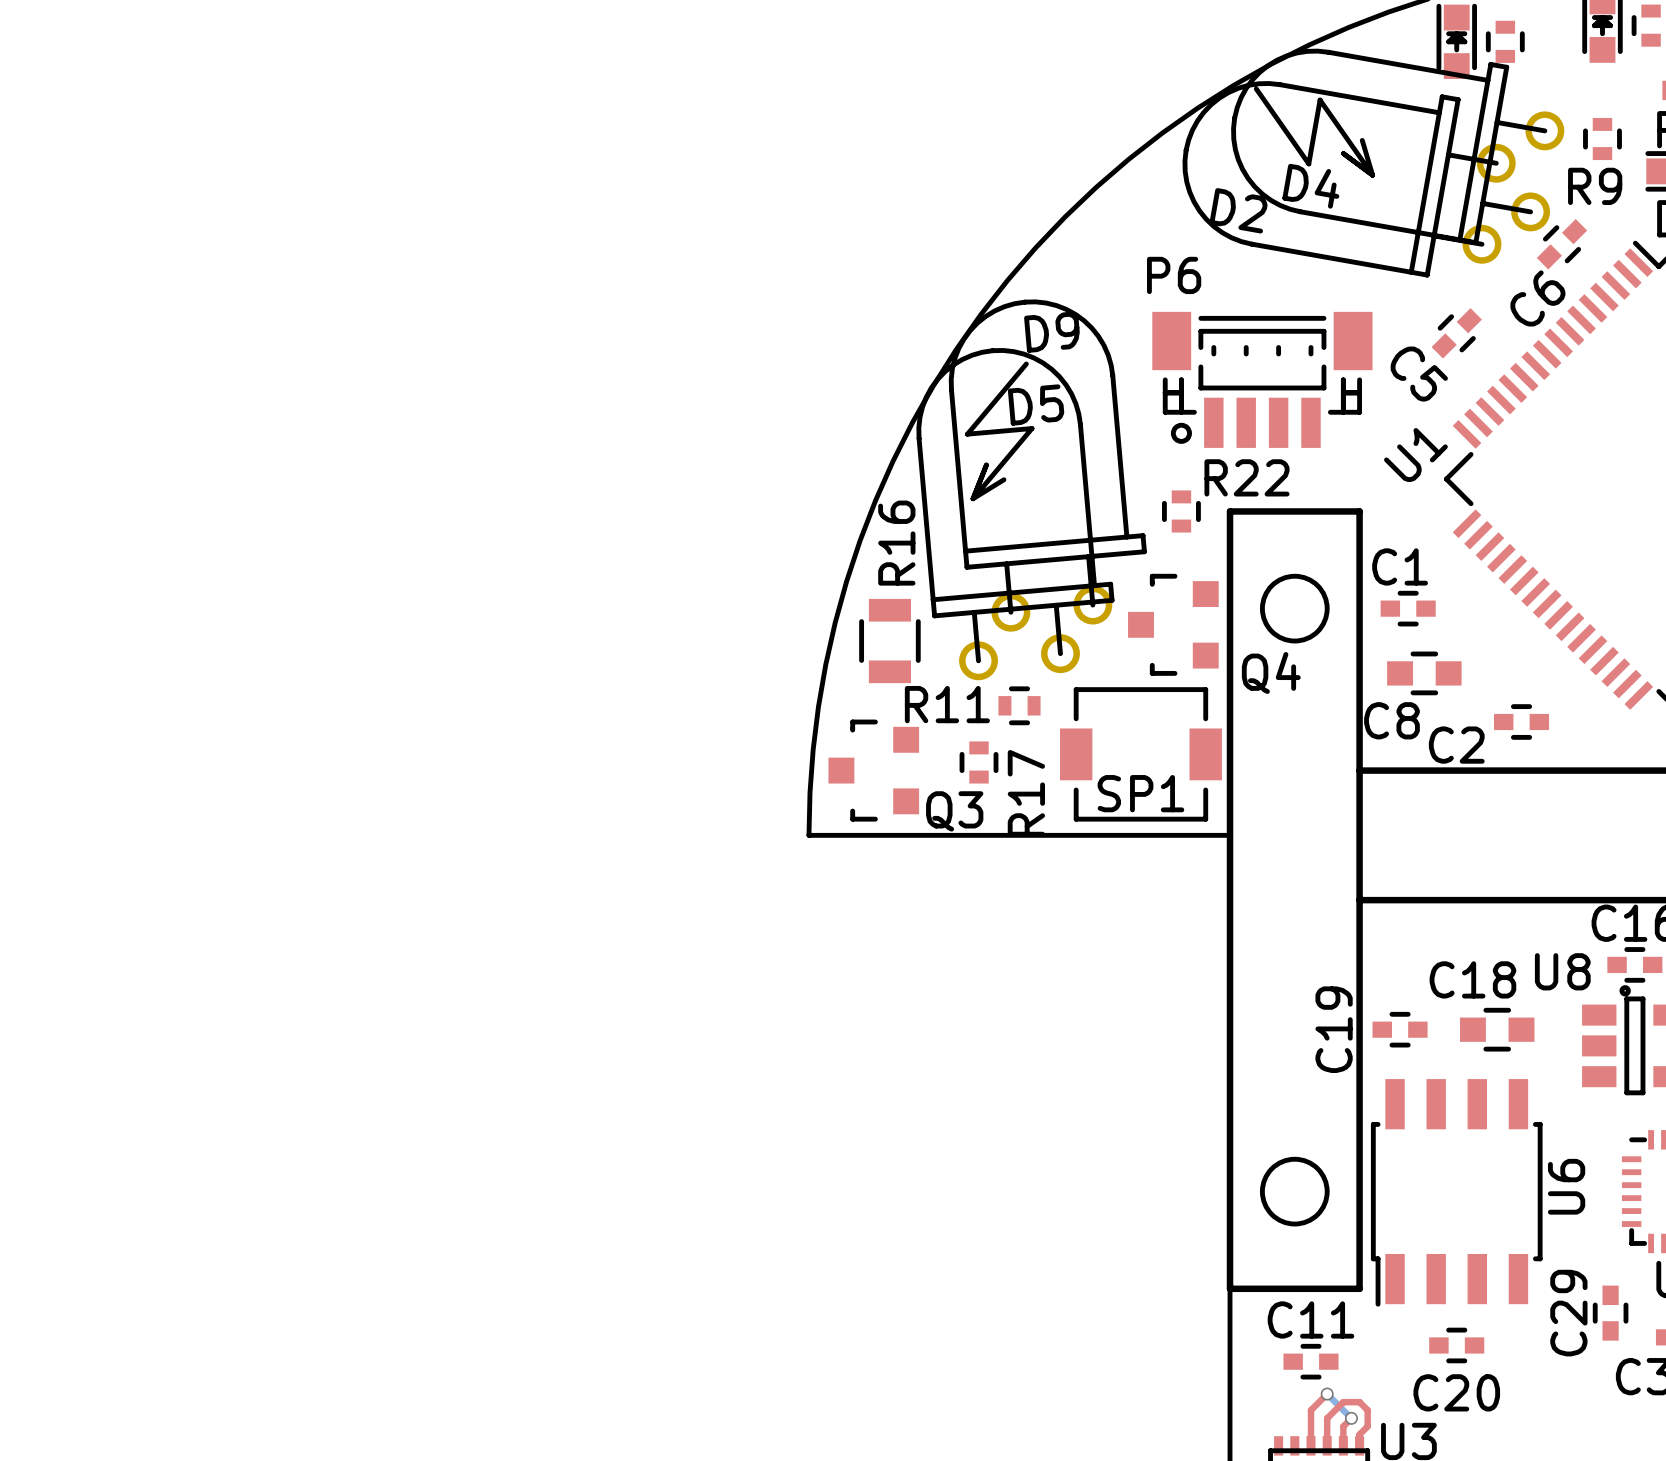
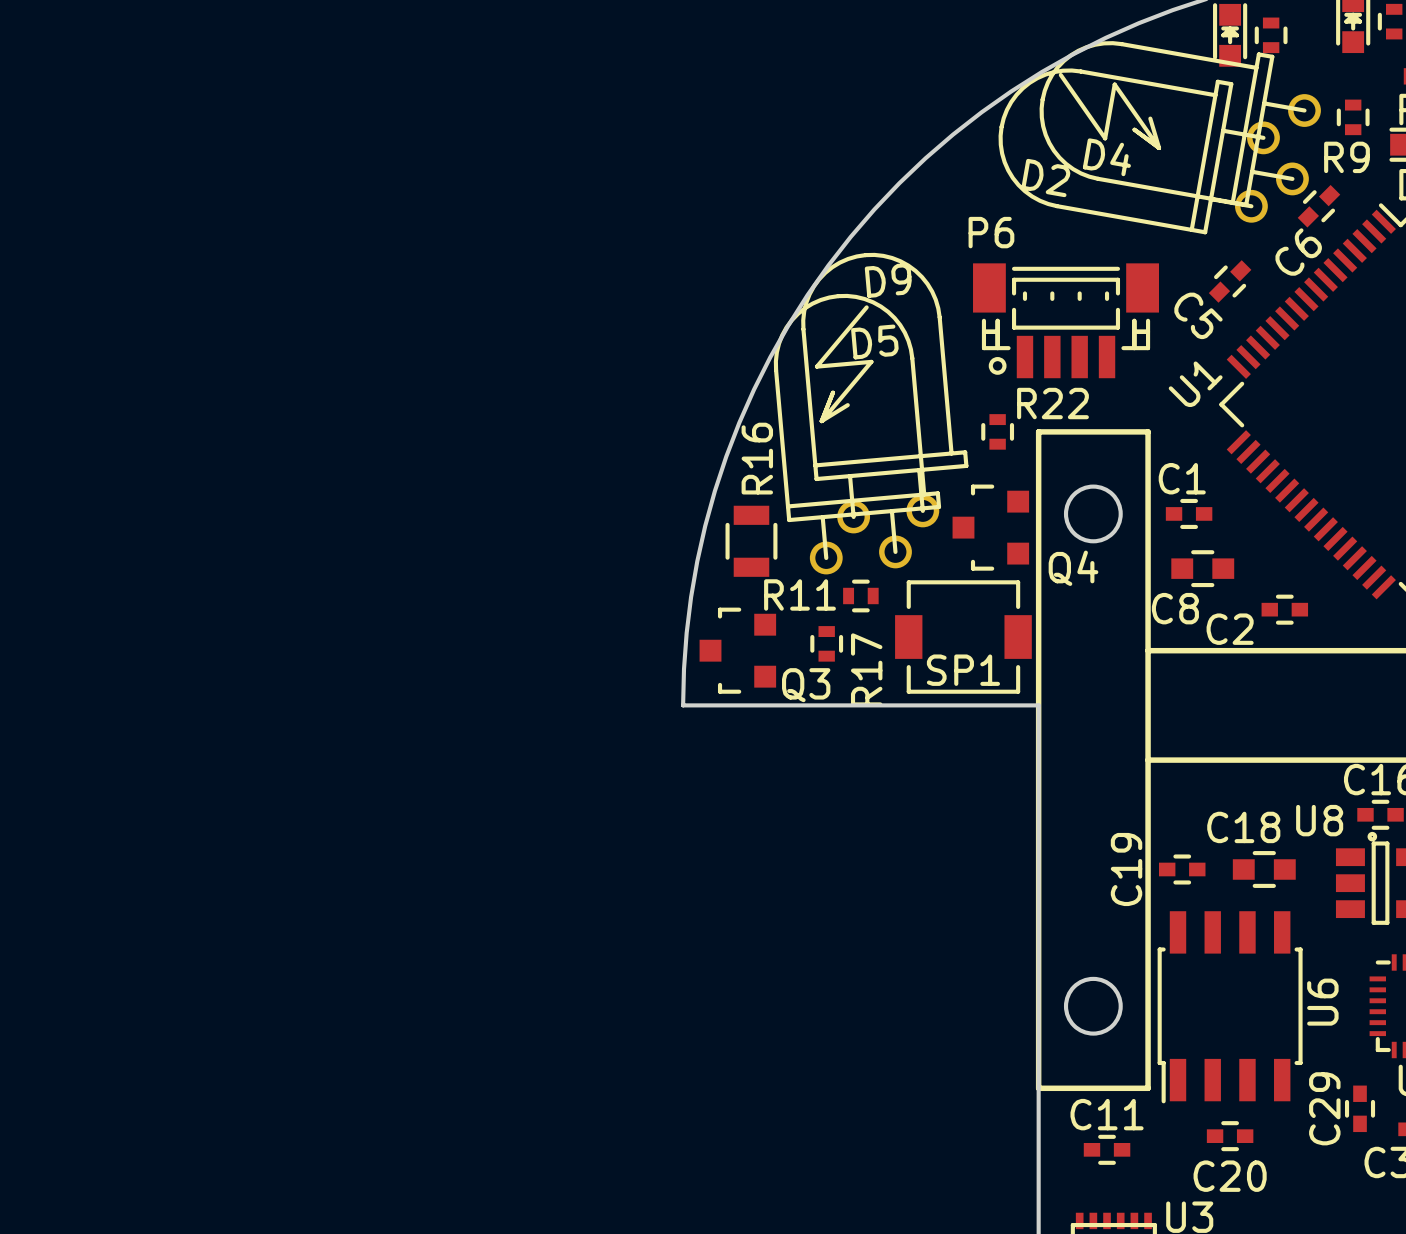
bottom track: (1327, 1394) (1351, 1418) -> none
top track: (1327, 1394) (1310, 1410) (1310, 1445) -> none
via: (1327, 1394) -> none
top track: (1351, 1418) (1343, 1426) (1343, 1445) -> none
via: (1351, 1418) -> none
top track: (1327, 1445) (1327, 1418) (1343, 1402) (1359, 1402) (1367, 1410) (1367, 1426) (1359, 1434) (1359, 1445) -> none

